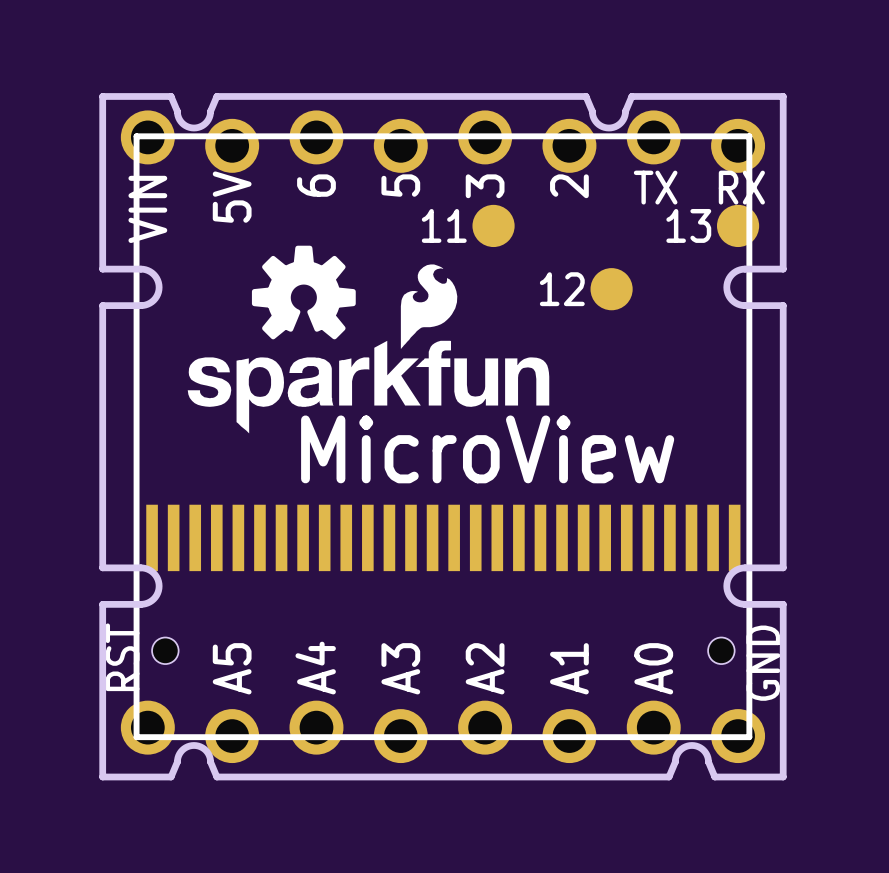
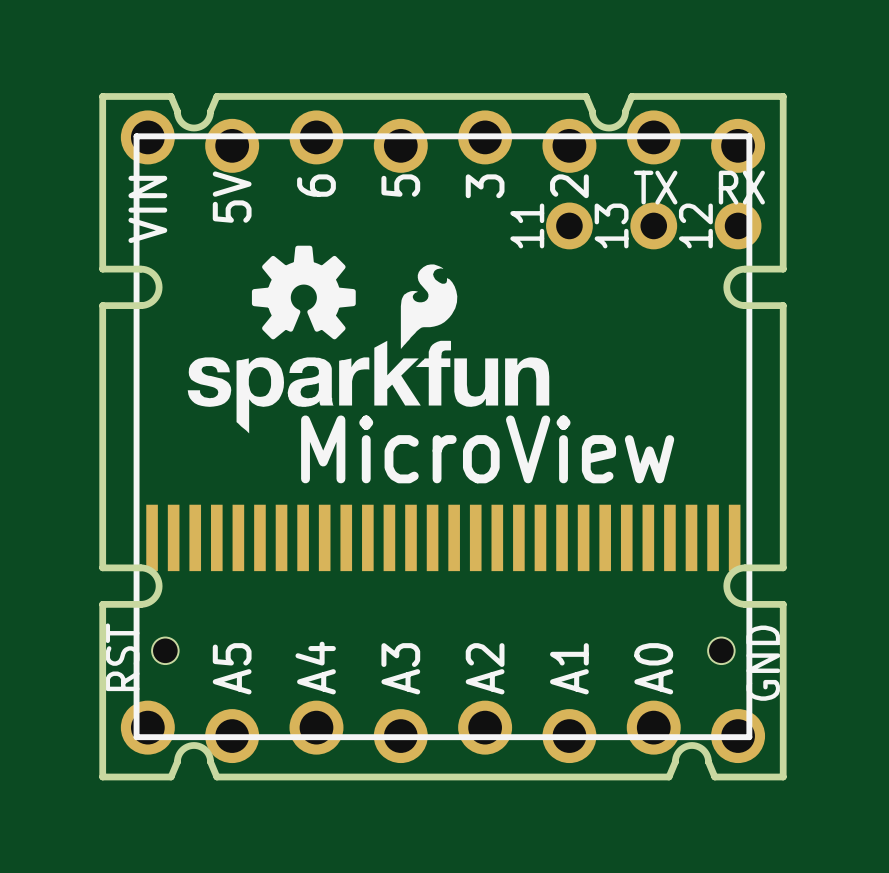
text rotation: 0° (444, 225) -> 90° counterclockwise (527, 225)
text position: 11 (444, 225) -> 11 (527, 225)
part: (493, 225) -> none
part: none -> (653, 225)
text rotation: 0° (688, 225) -> 90° counterclockwise (611, 225)
text position: 13 (688, 225) -> 13 (611, 225)
part: (738, 225) -> none
text rotation: 0° (562, 289) -> 90° counterclockwise (695, 225)
text position: 12 (562, 289) -> 12 (695, 225)
part: (611, 289) -> none

